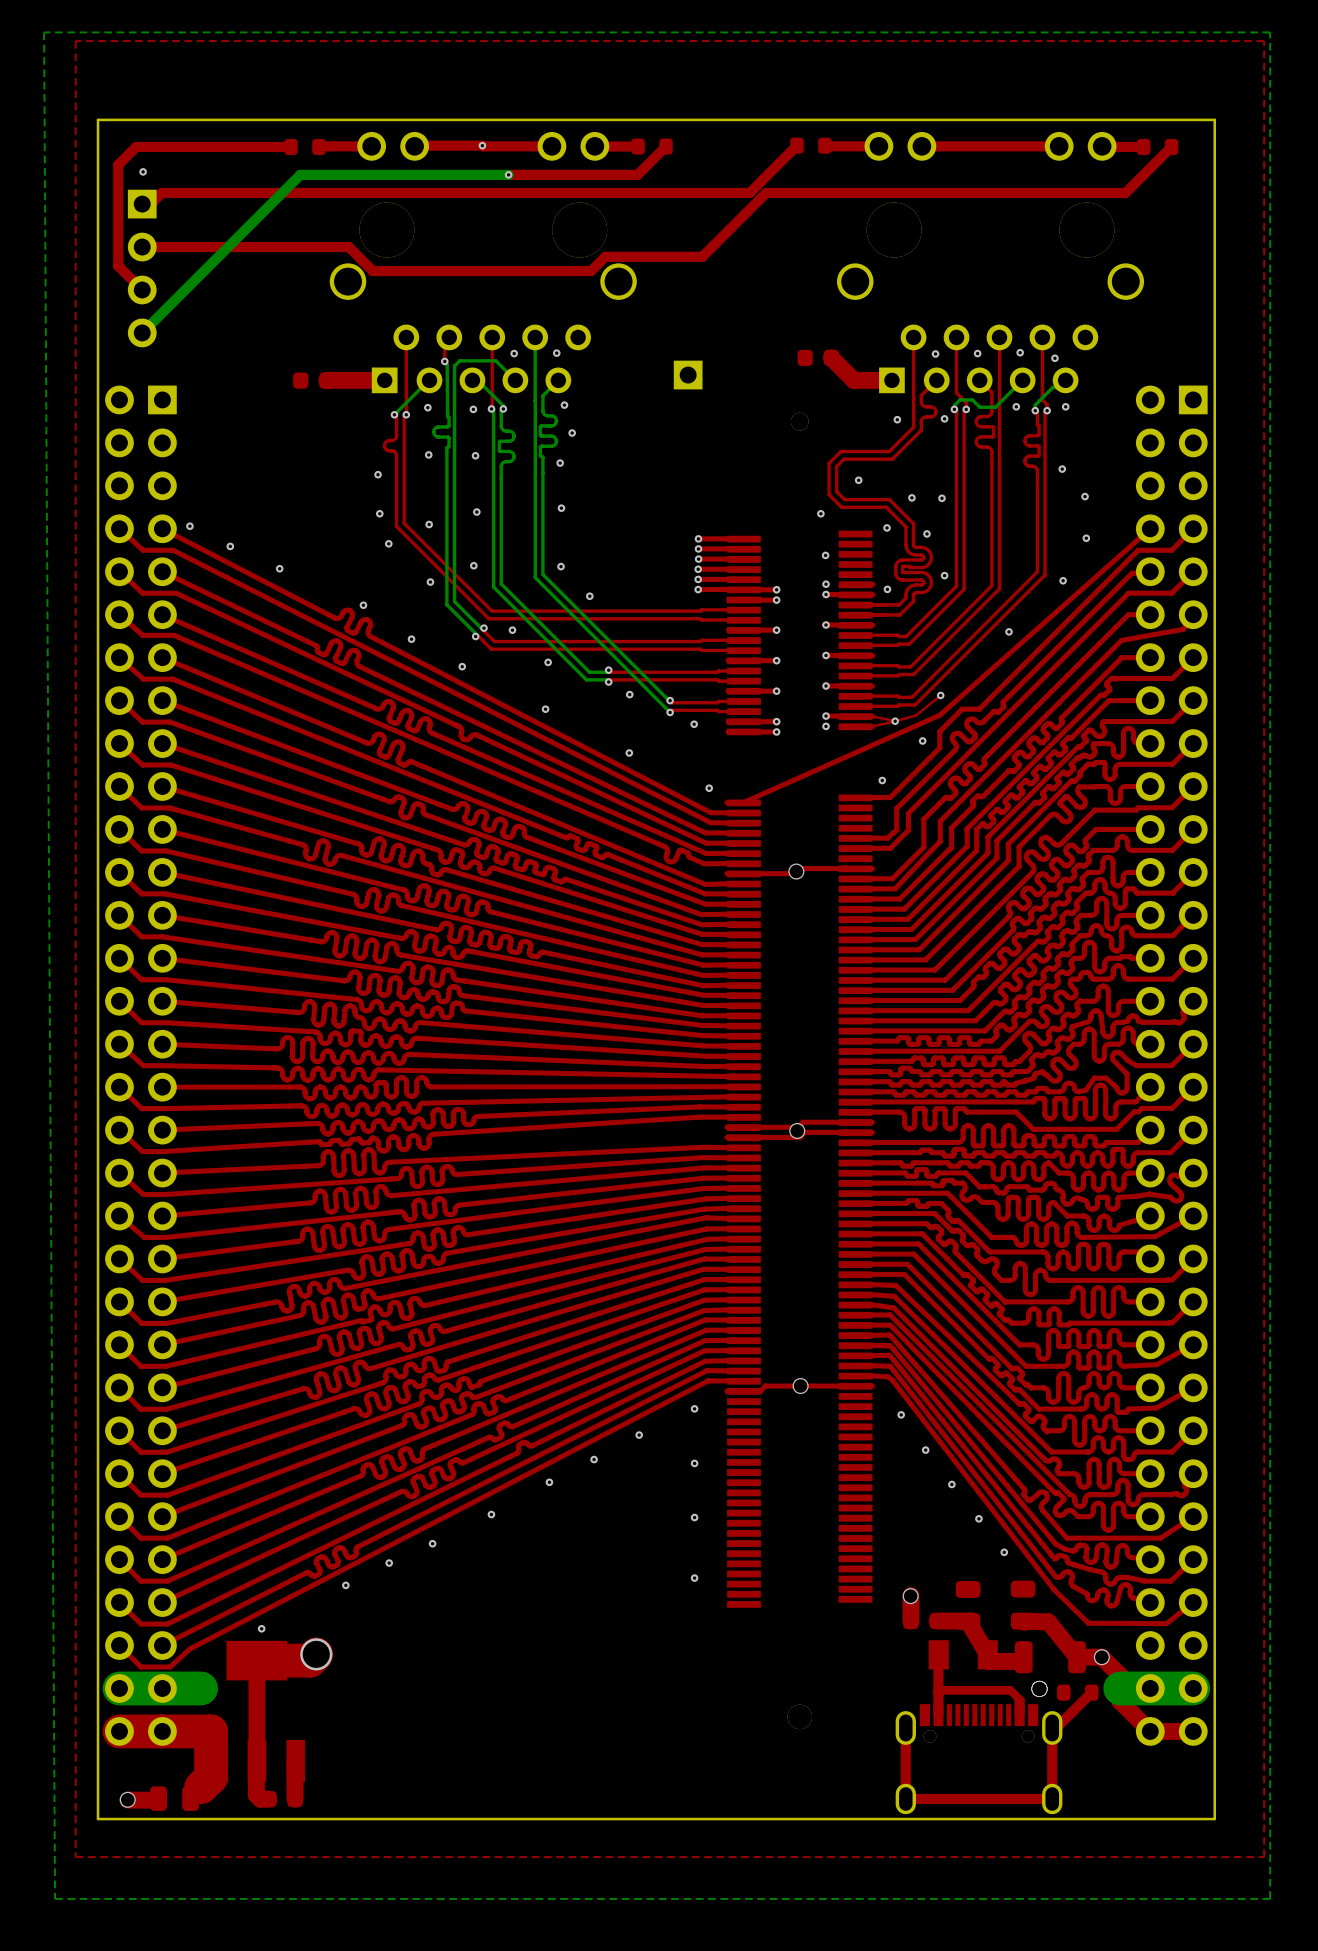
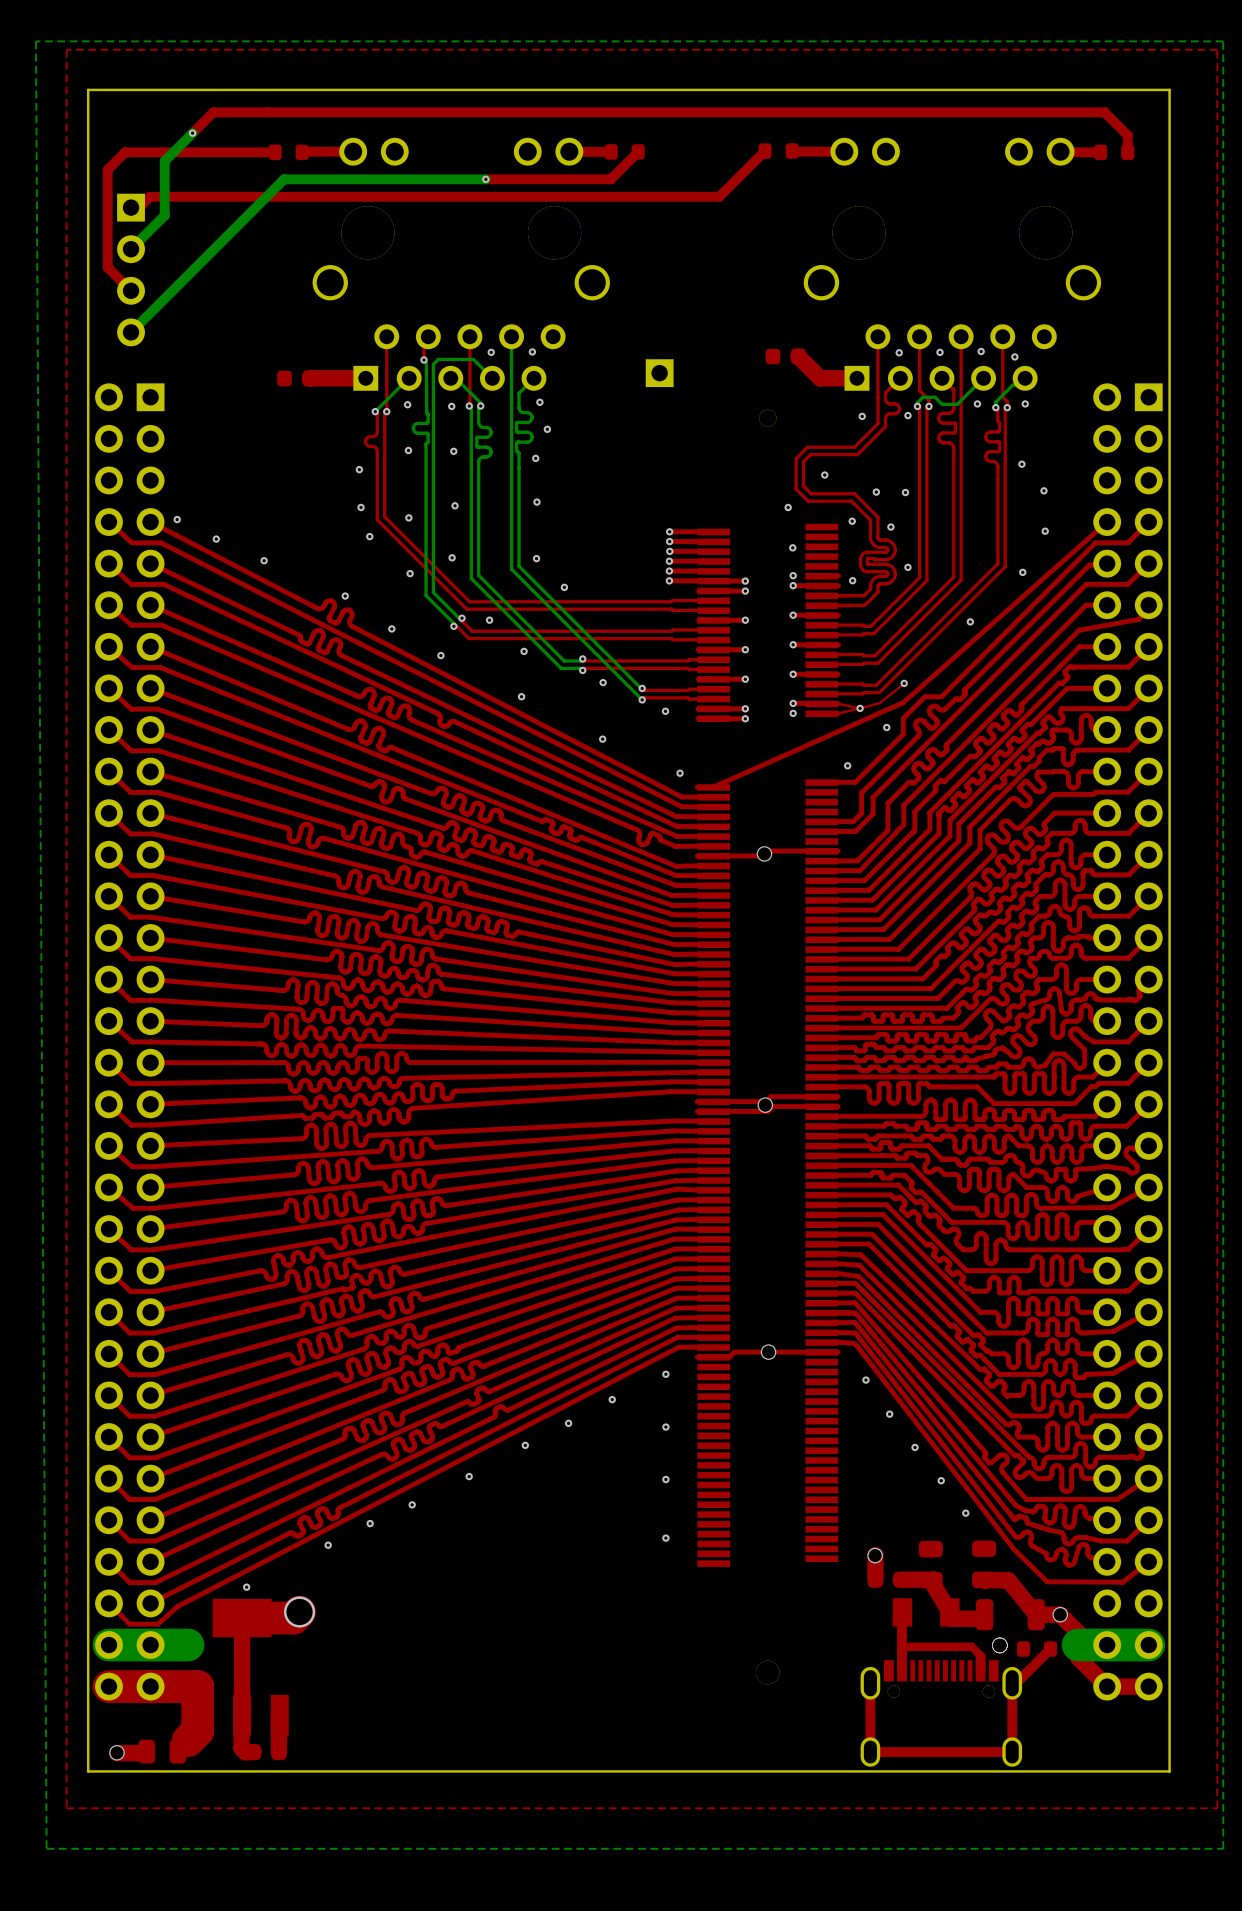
board edge: (1214, 119) (98, 119) -> (1169, 126) (1169, 89) (88, 89) (88, 126)
bottom track: none -> (192, 133) (164, 161) (164, 215) (131, 249)
via: (482, 145) -> none
top track: (551, 146) (414, 146) -> none
top track: (1059, 146) (921, 146) -> none
top track: (1171, 146) (1125, 192) (766, 192) (702, 256) (605, 256) (591, 271) (372, 271) (348, 247) (142, 247) -> (1127, 152) (1127, 135) (1104, 112) (213, 112) (192, 133)
via position: (143, 171) -> (192, 133)

